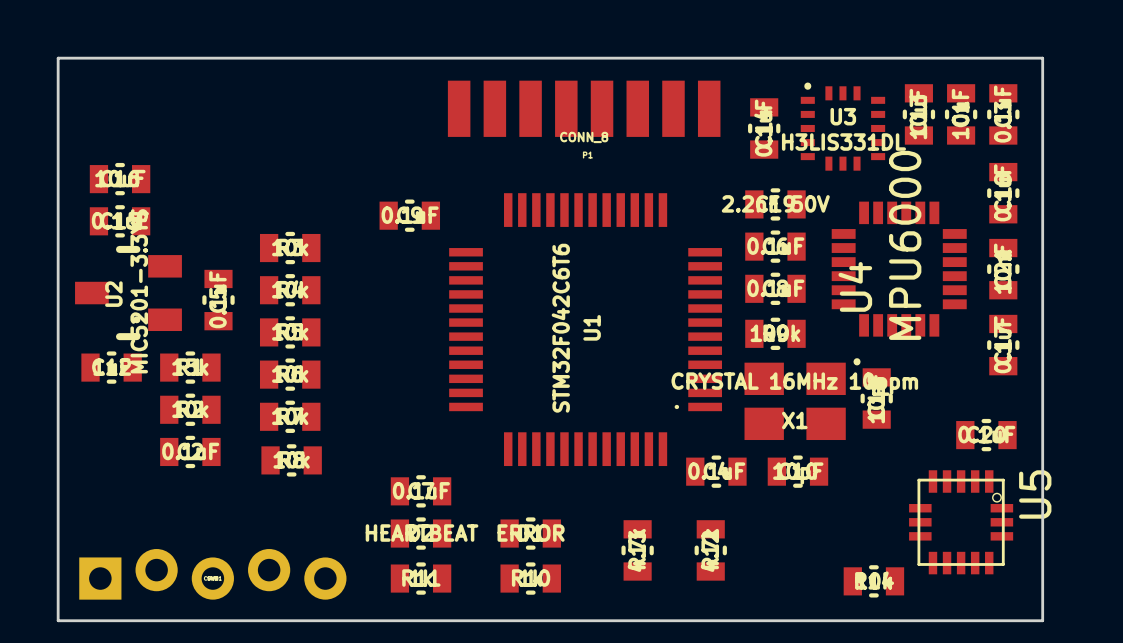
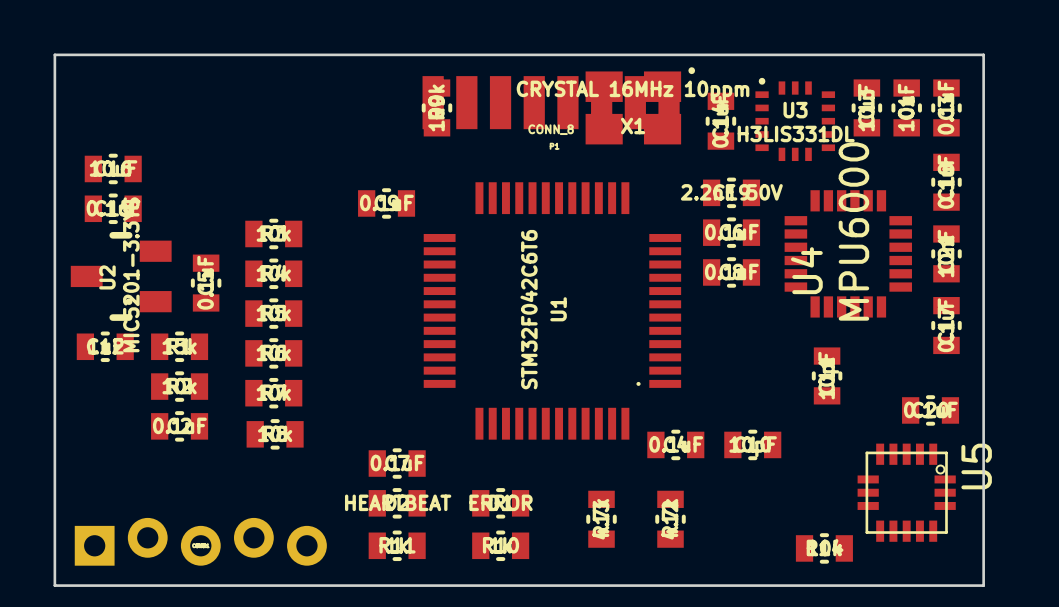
part rotation: 0° (775, 333) -> 90° clockwise (436, 107)
part position: (775, 333) -> (436, 107)
X1 position: (802, 399) -> (640, 105)

